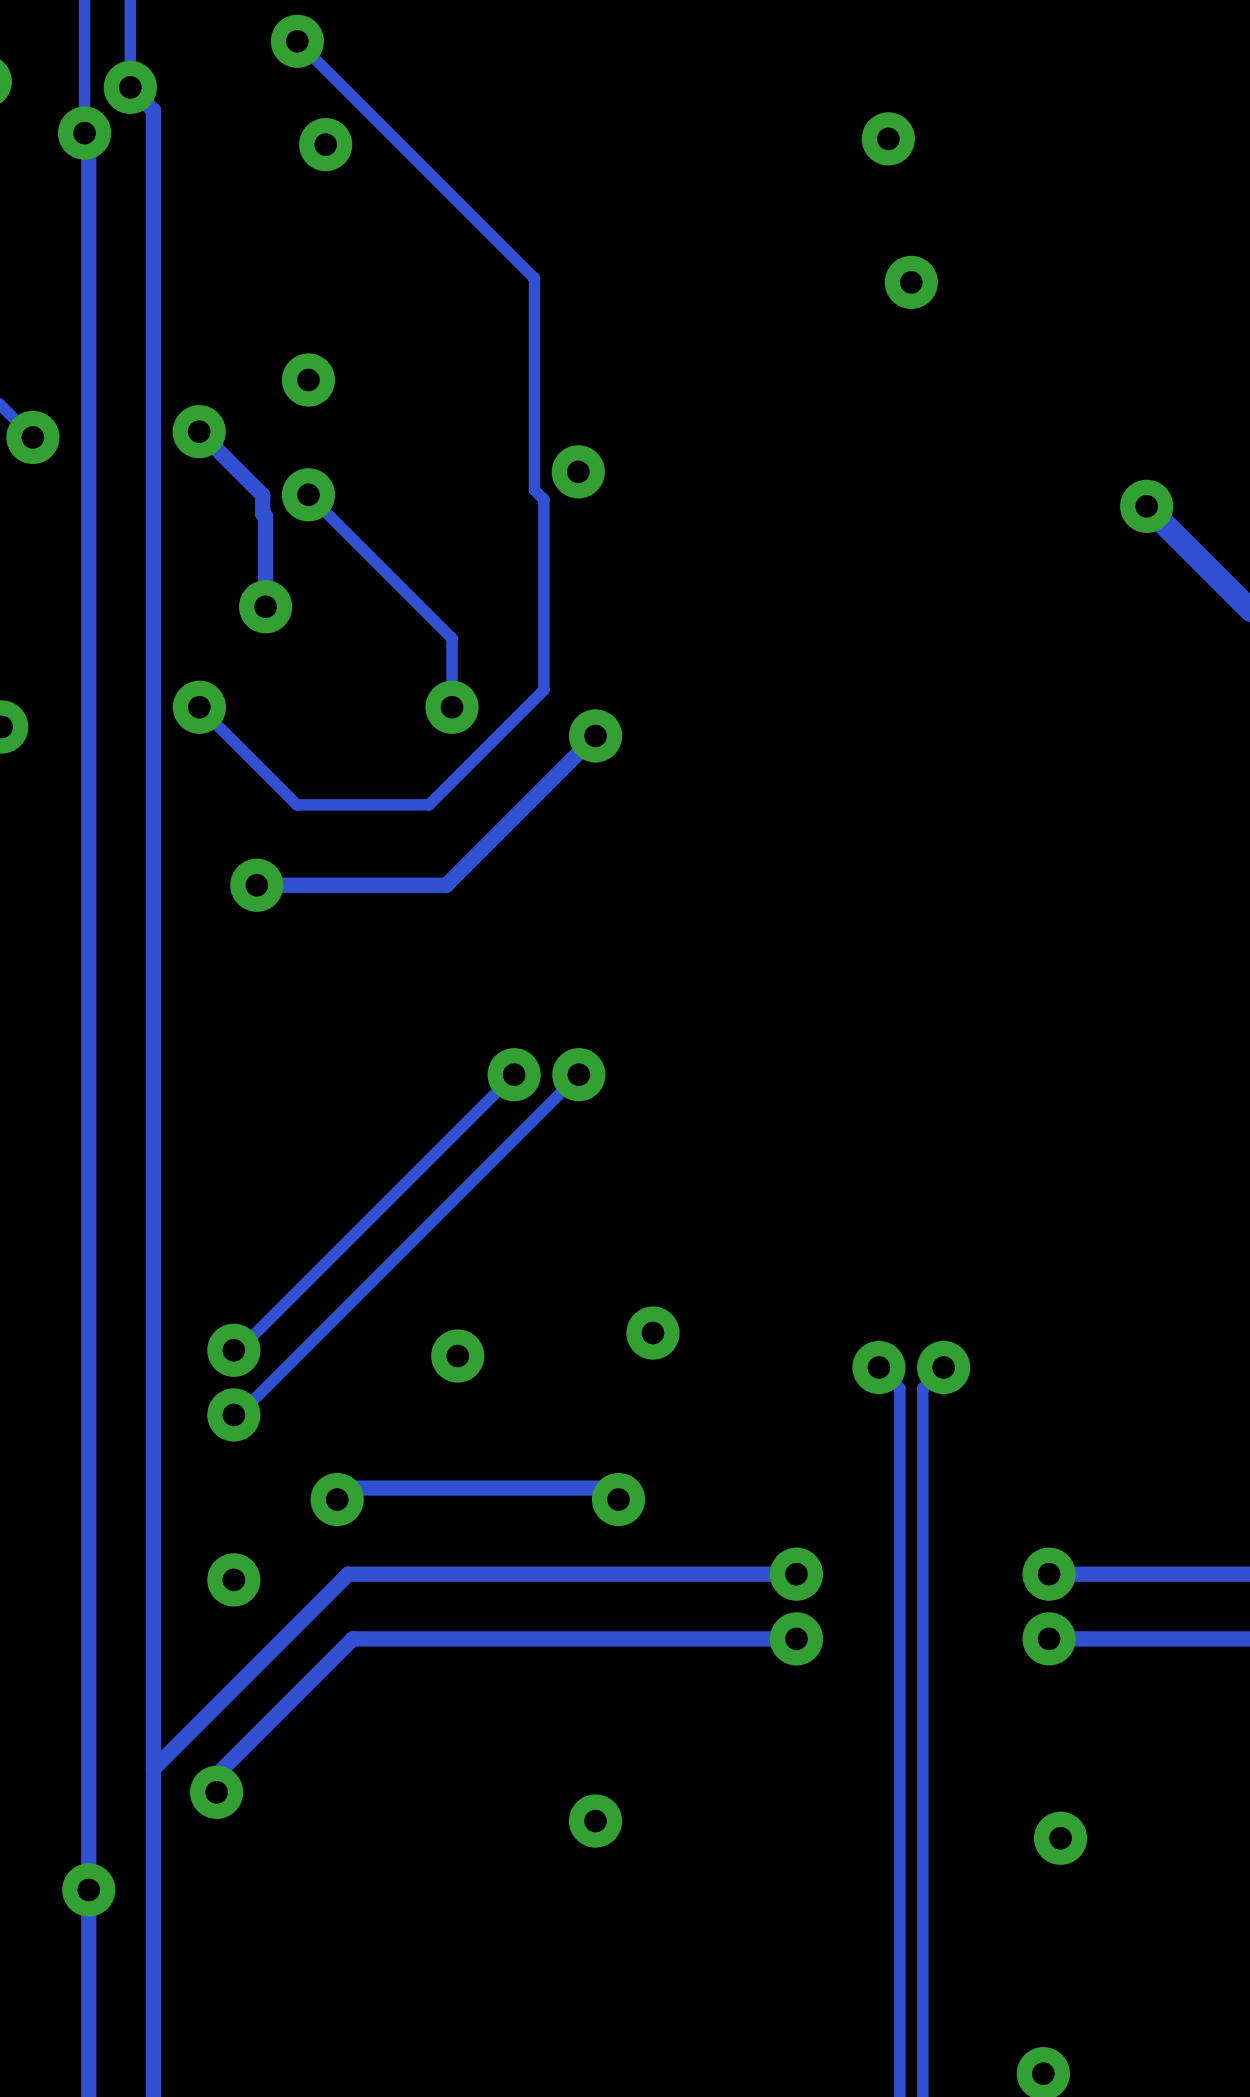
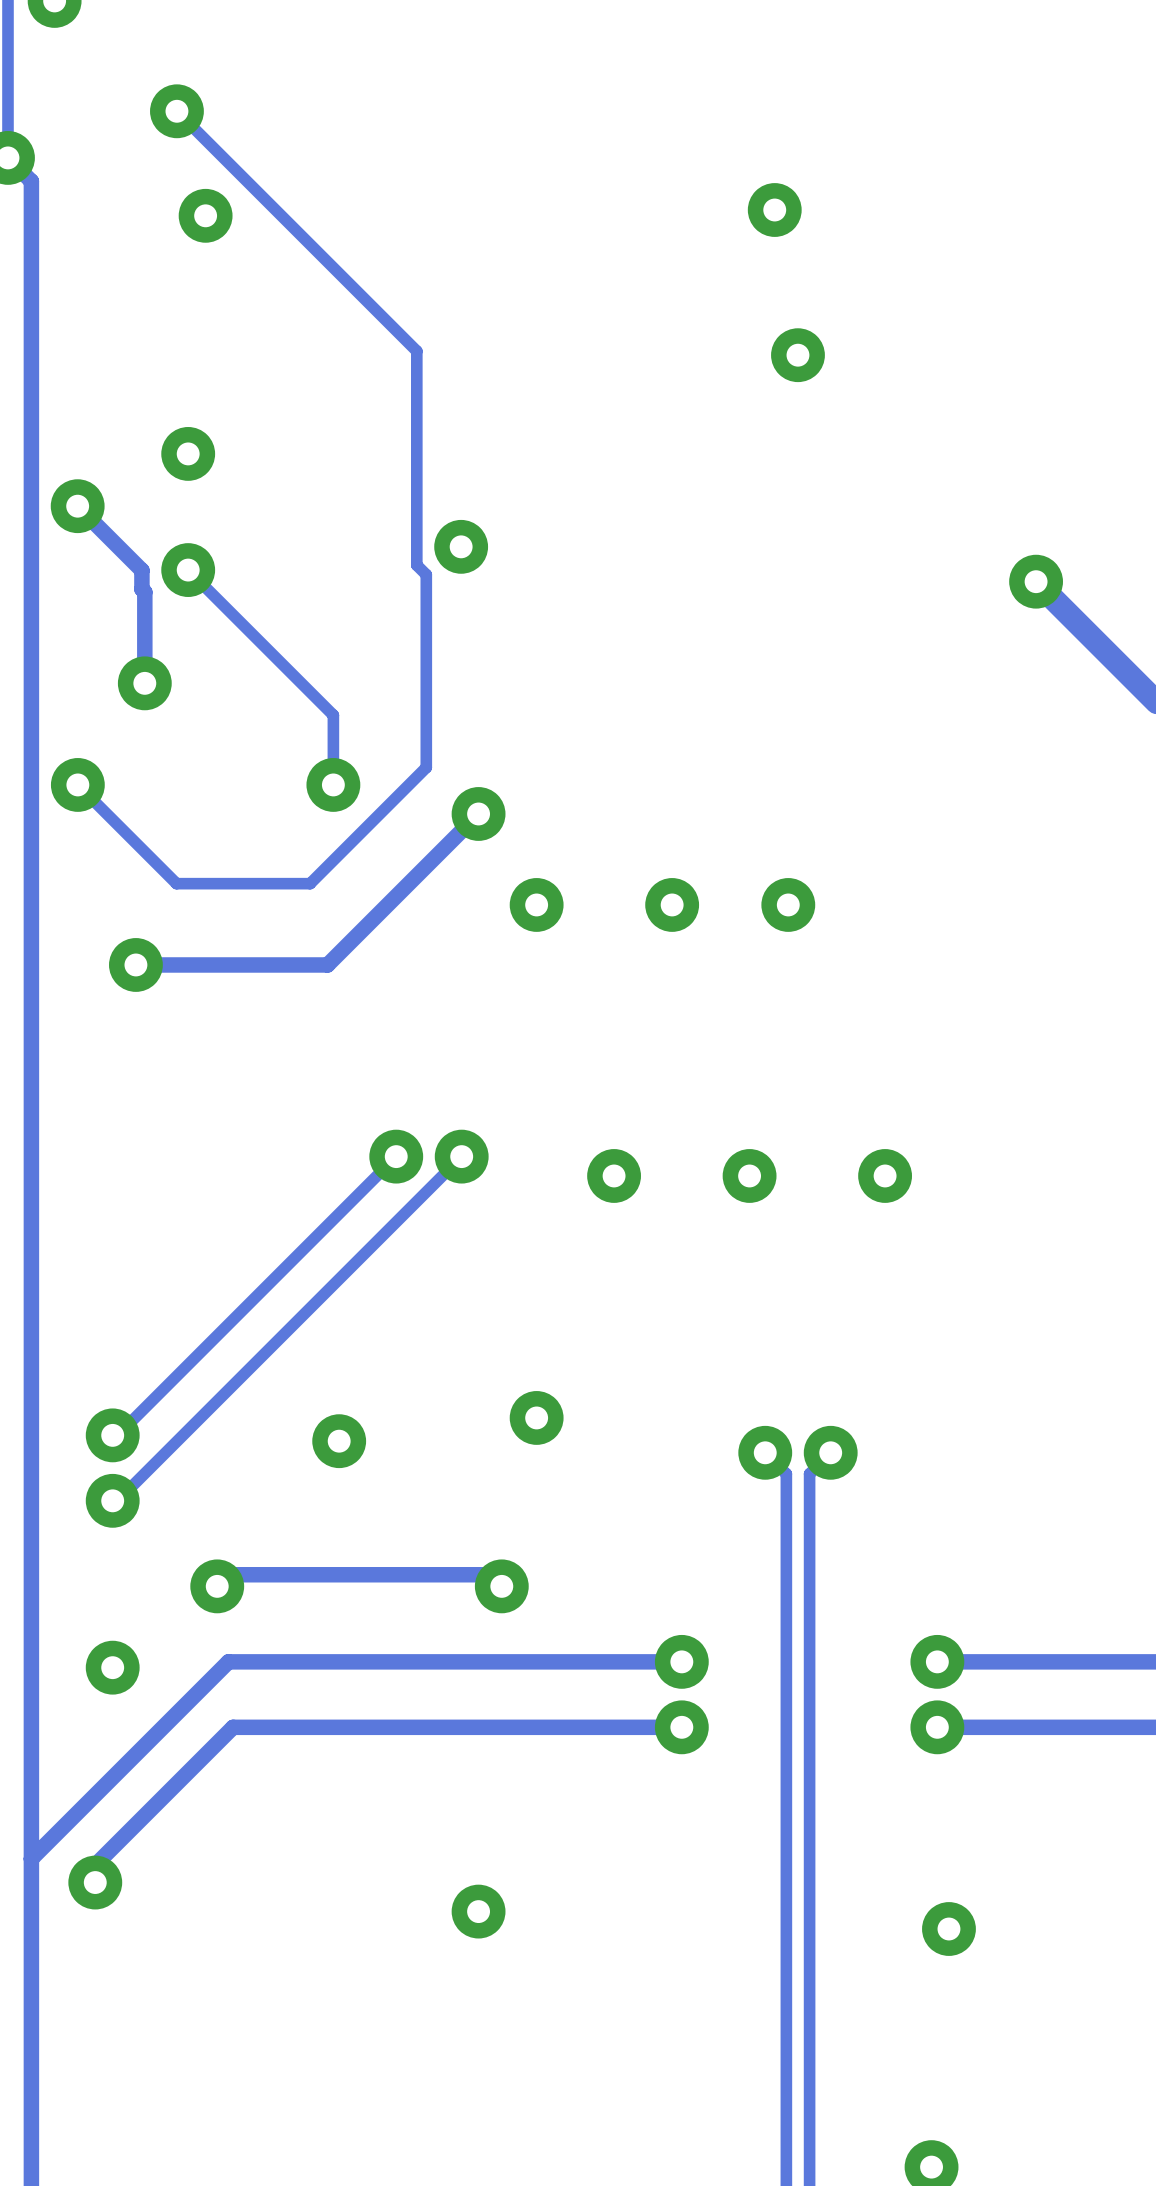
via: none -> (536, 904)
via: none -> (672, 904)
via: none -> (788, 904)
via: none -> (614, 1175)
via: none -> (749, 1175)
via: none -> (885, 1175)

